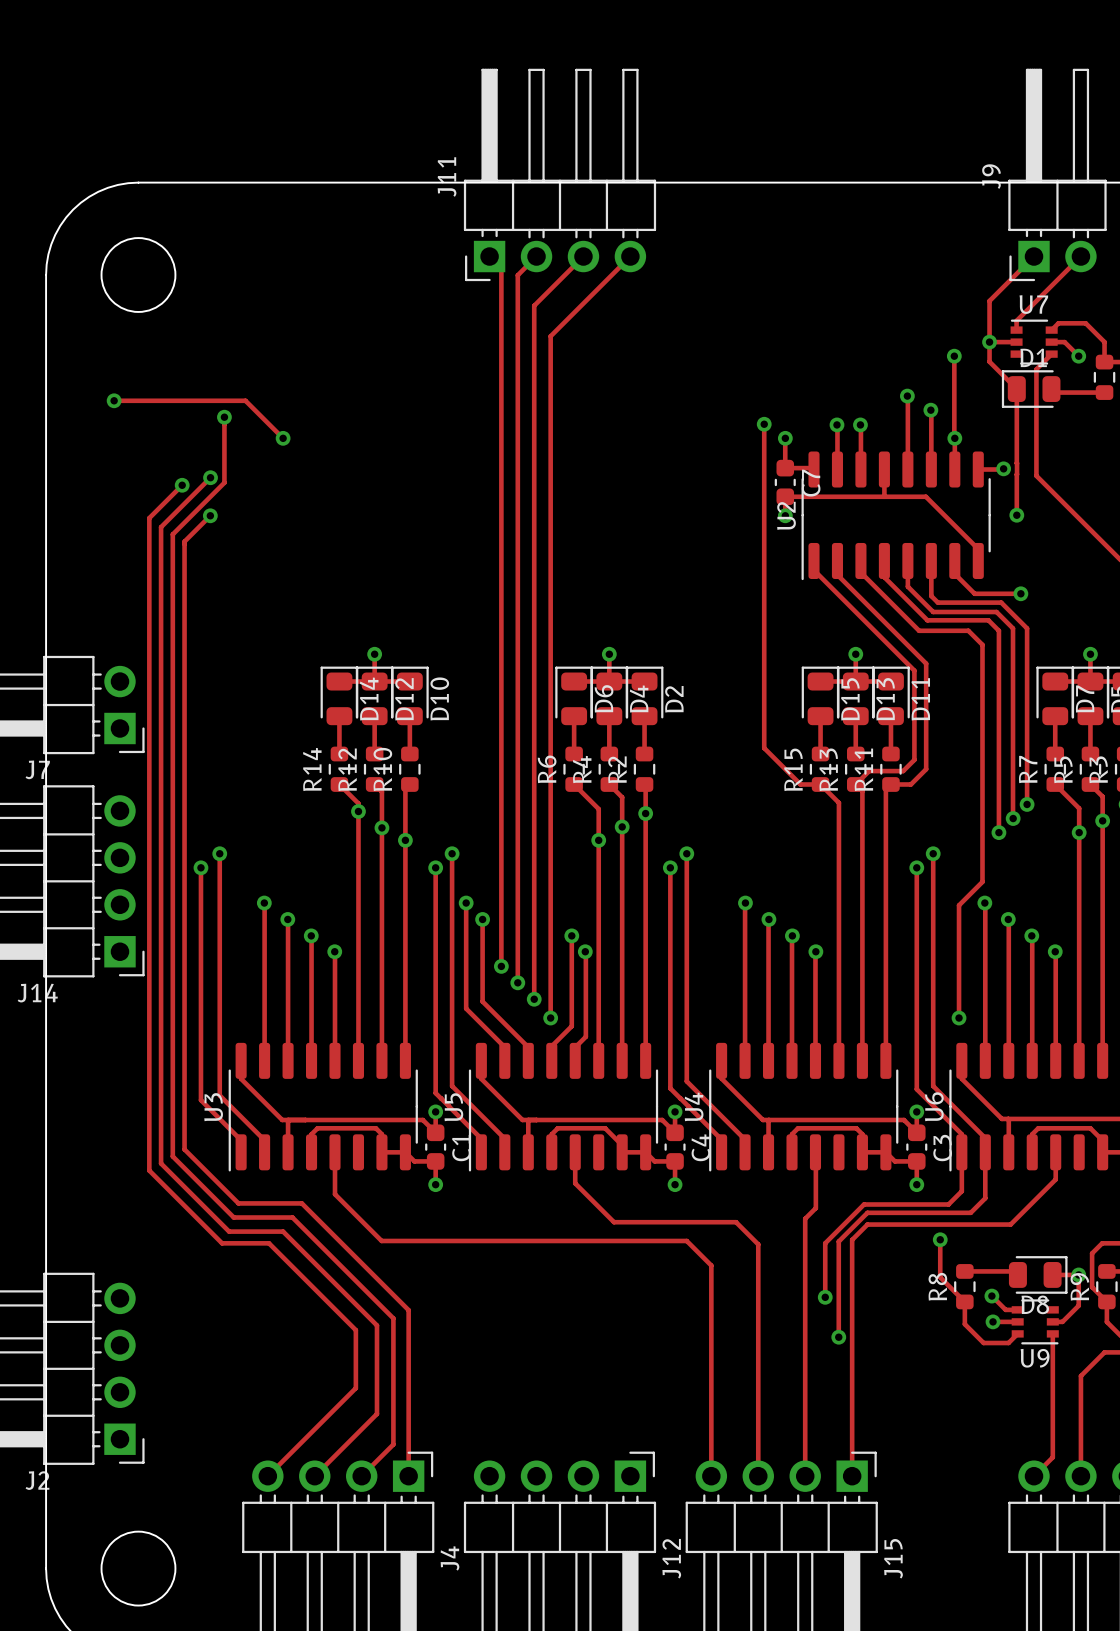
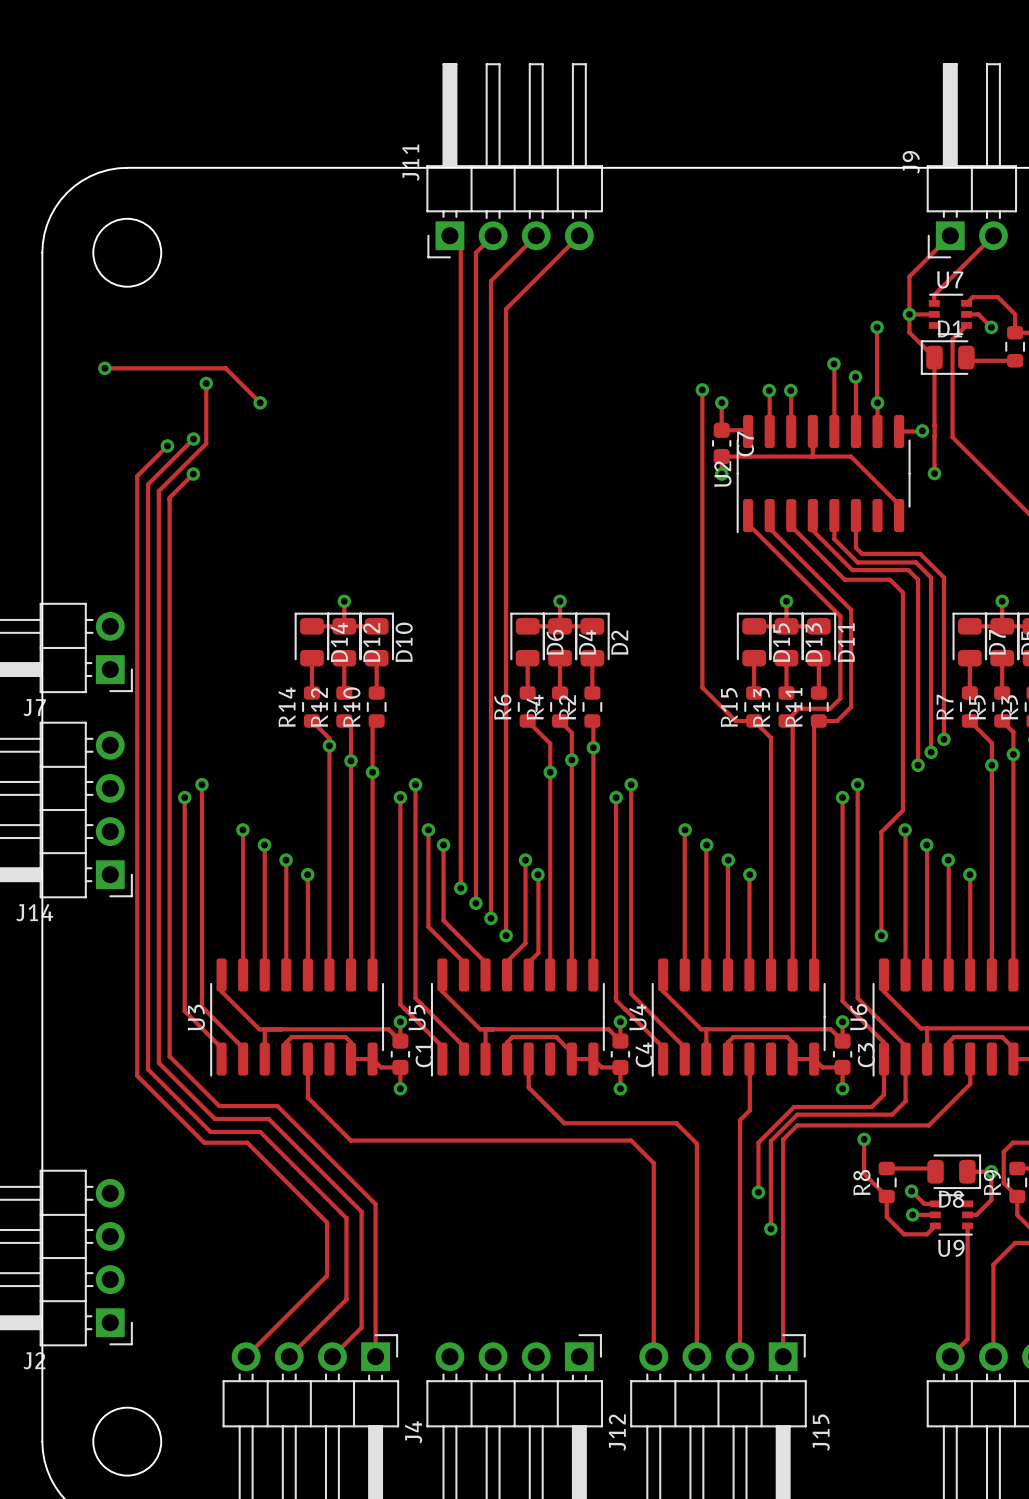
track: (954, 560) (954, 573) (974, 593) (1020, 593) -> none
via: (1020, 593) -> none

